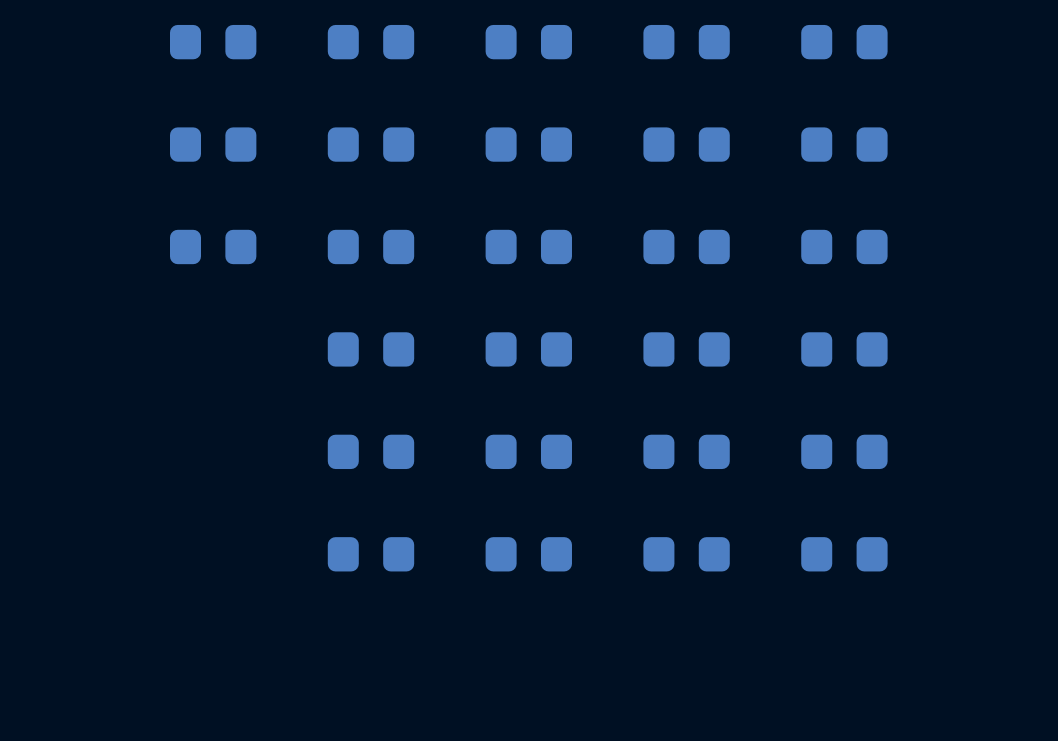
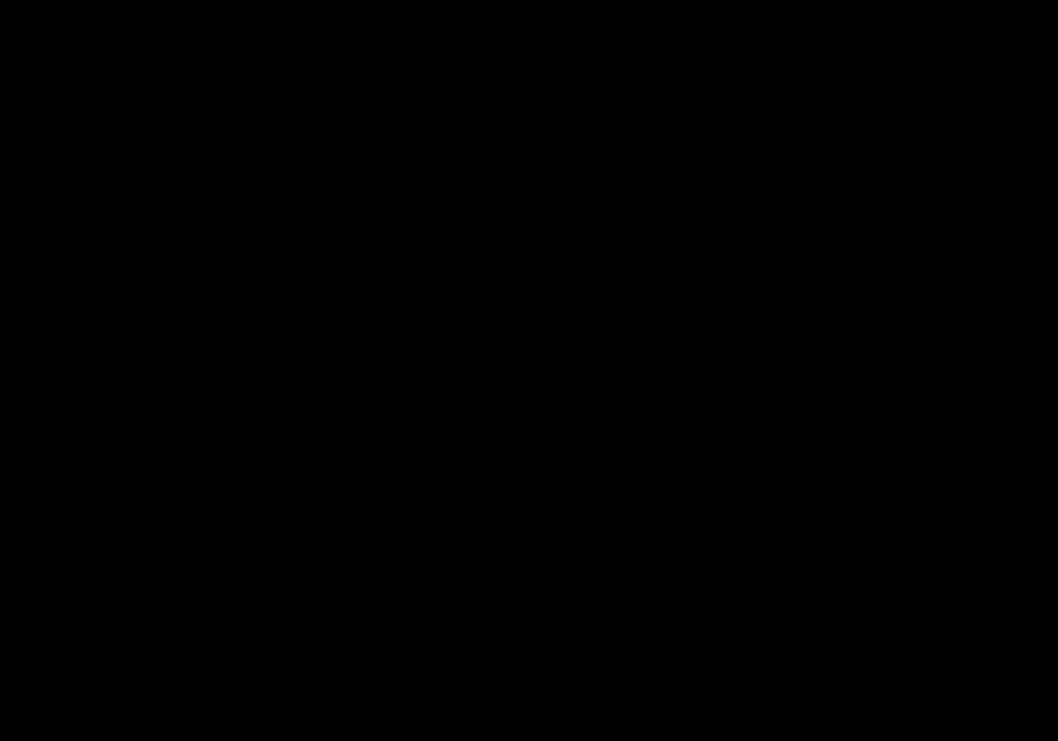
part: (213, 42) -> none
part: (370, 42) -> none
part: (528, 42) -> none
part: (686, 42) -> none
part: (844, 42) -> none
part: (213, 144) -> none
part: (370, 144) -> none
part: (528, 144) -> none
part: (686, 144) -> none
part: (844, 144) -> none
part: (213, 246) -> none
part: (370, 246) -> none
part: (528, 246) -> none
part: (686, 246) -> none
part: (844, 246) -> none
part: (370, 349) -> none
part: (528, 349) -> none
part: (686, 349) -> none
part: (844, 349) -> none
part: (370, 451) -> none
part: (528, 451) -> none
part: (686, 451) -> none
part: (844, 451) -> none
part: (370, 554) -> none
part: (528, 554) -> none
part: (686, 554) -> none
part: (844, 554) -> none

